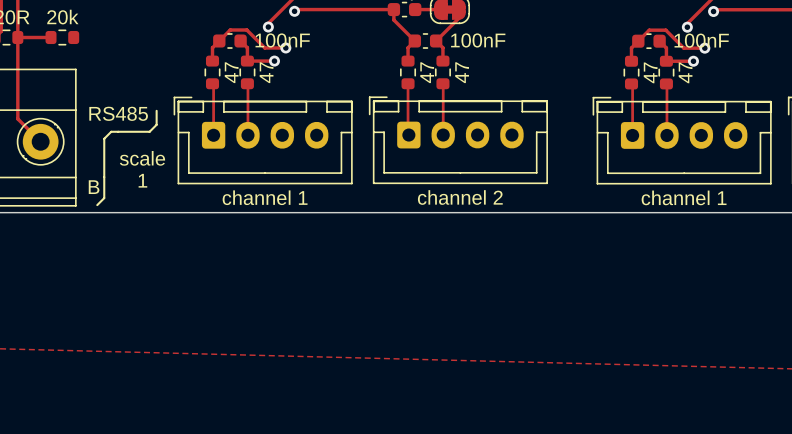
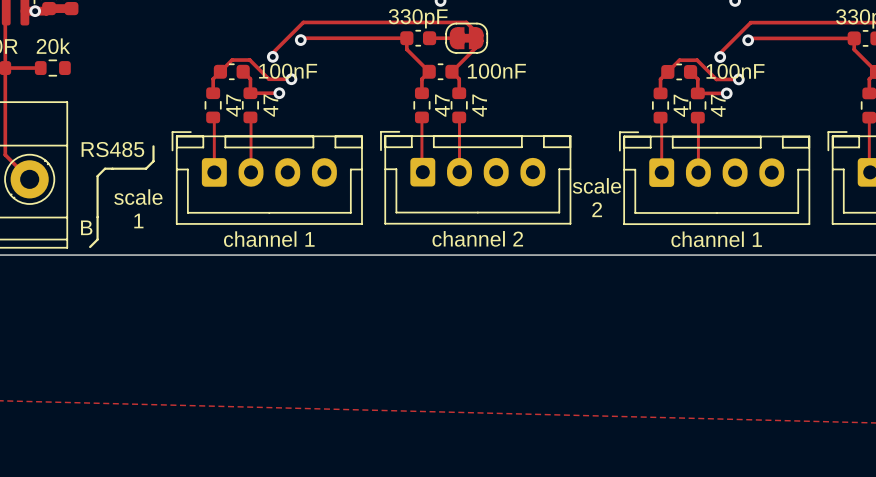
text: none -> scale (596, 185)
text: none -> 2 (597, 209)

